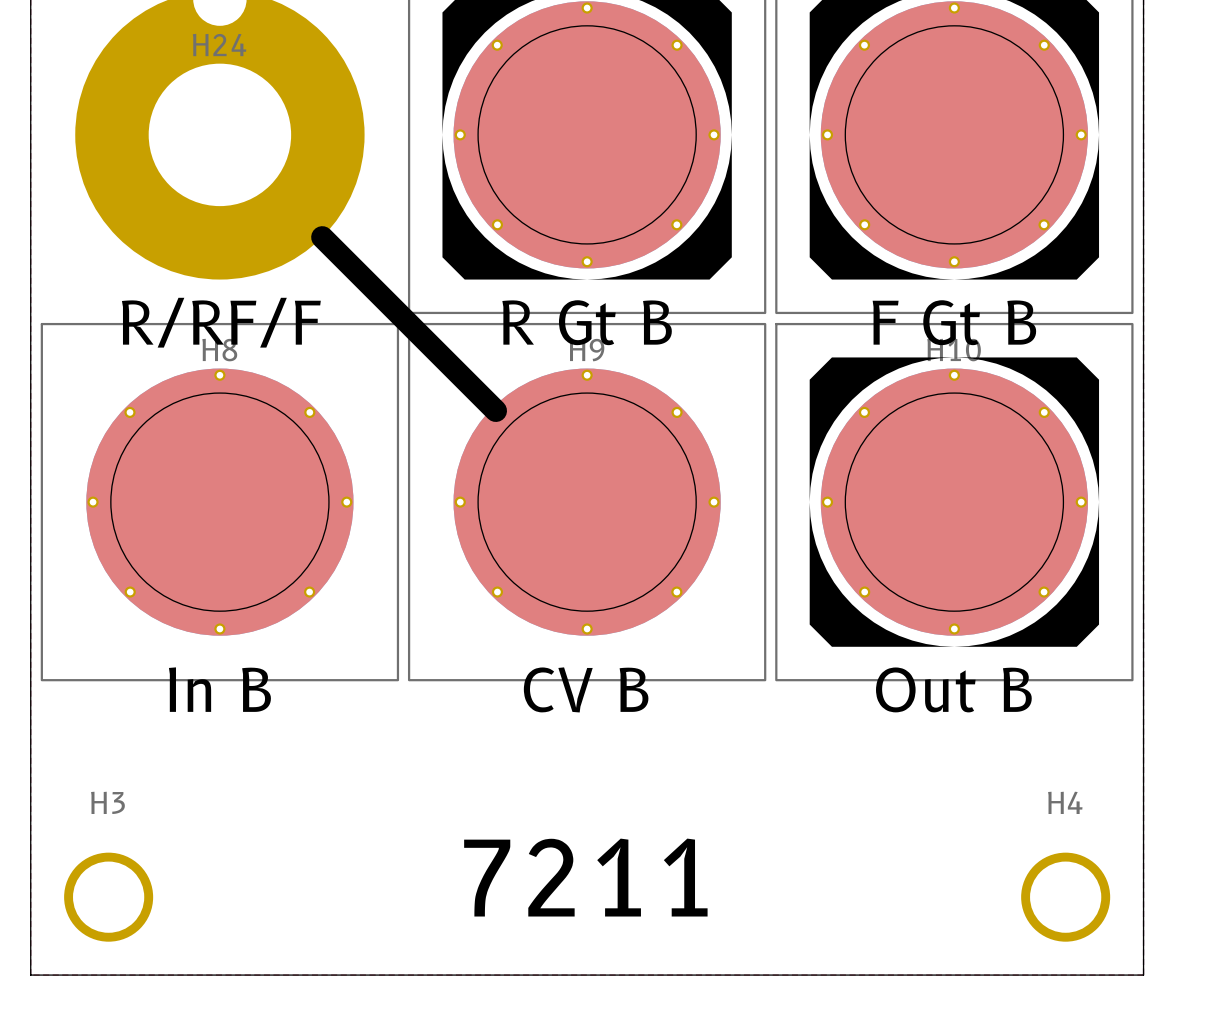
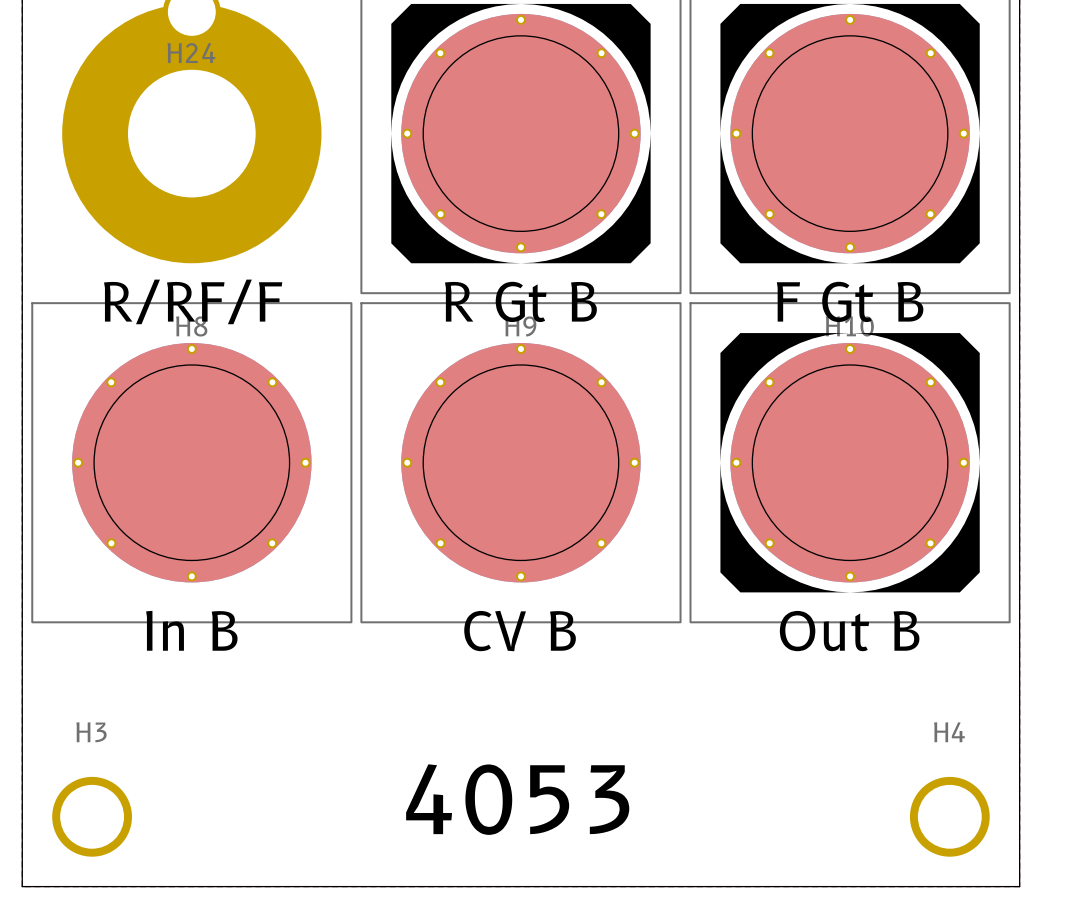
line: (322, 237) (495, 410) -> none
text: 7211 (585, 877) -> 4053 (517, 799)

